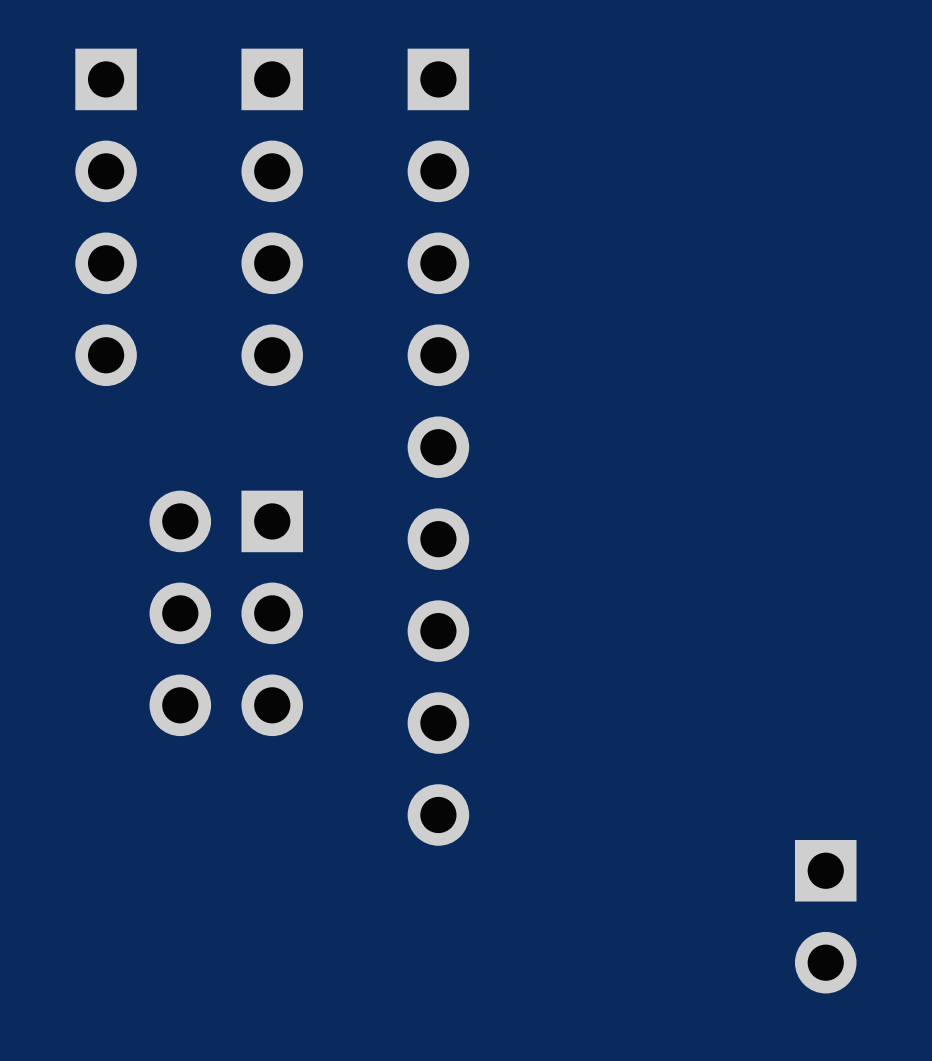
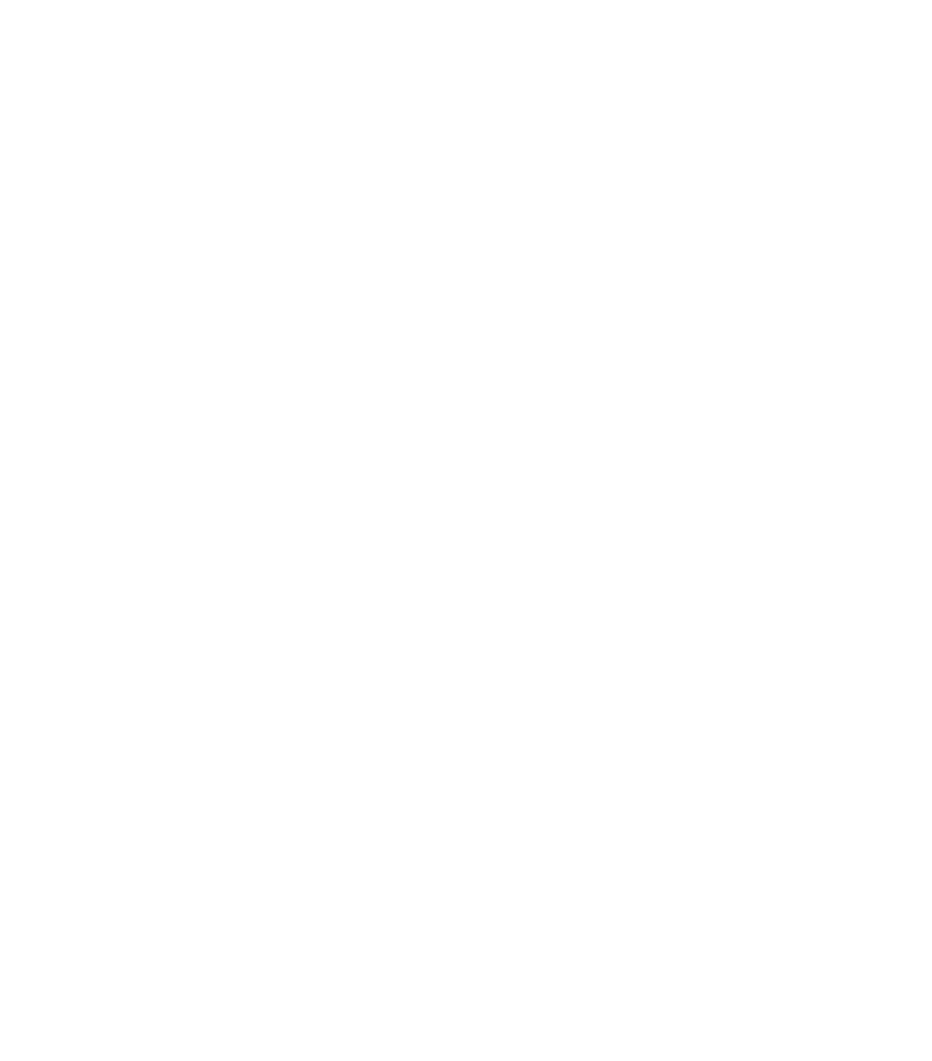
part: (106, 217) -> none
part: (272, 217) -> none
part: (438, 447) -> none
part: (226, 613) -> none
part: (825, 916) -> none

